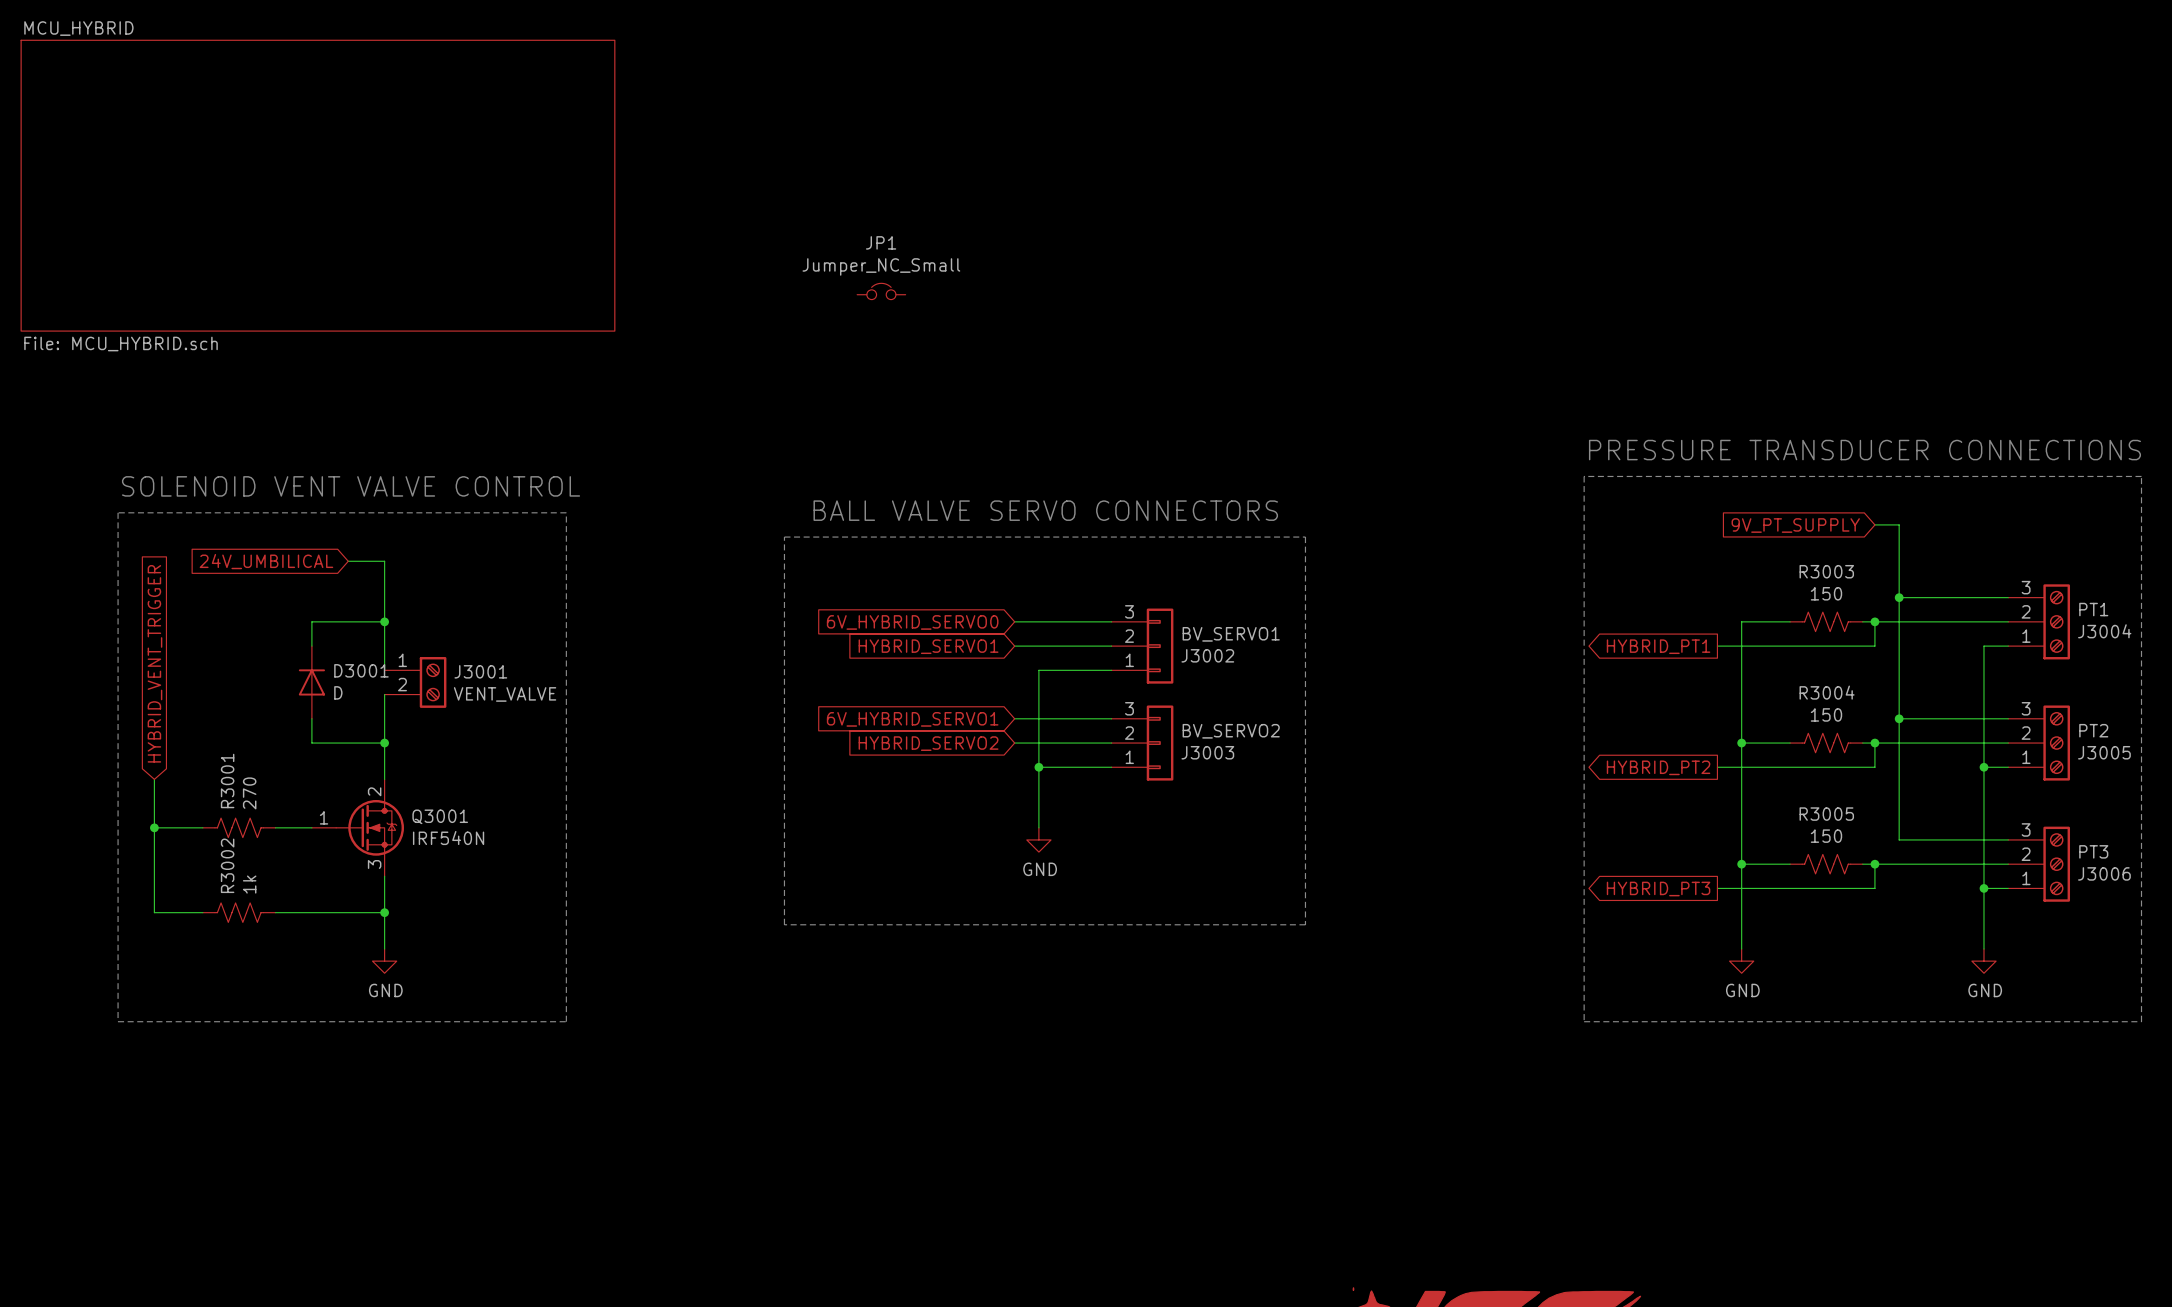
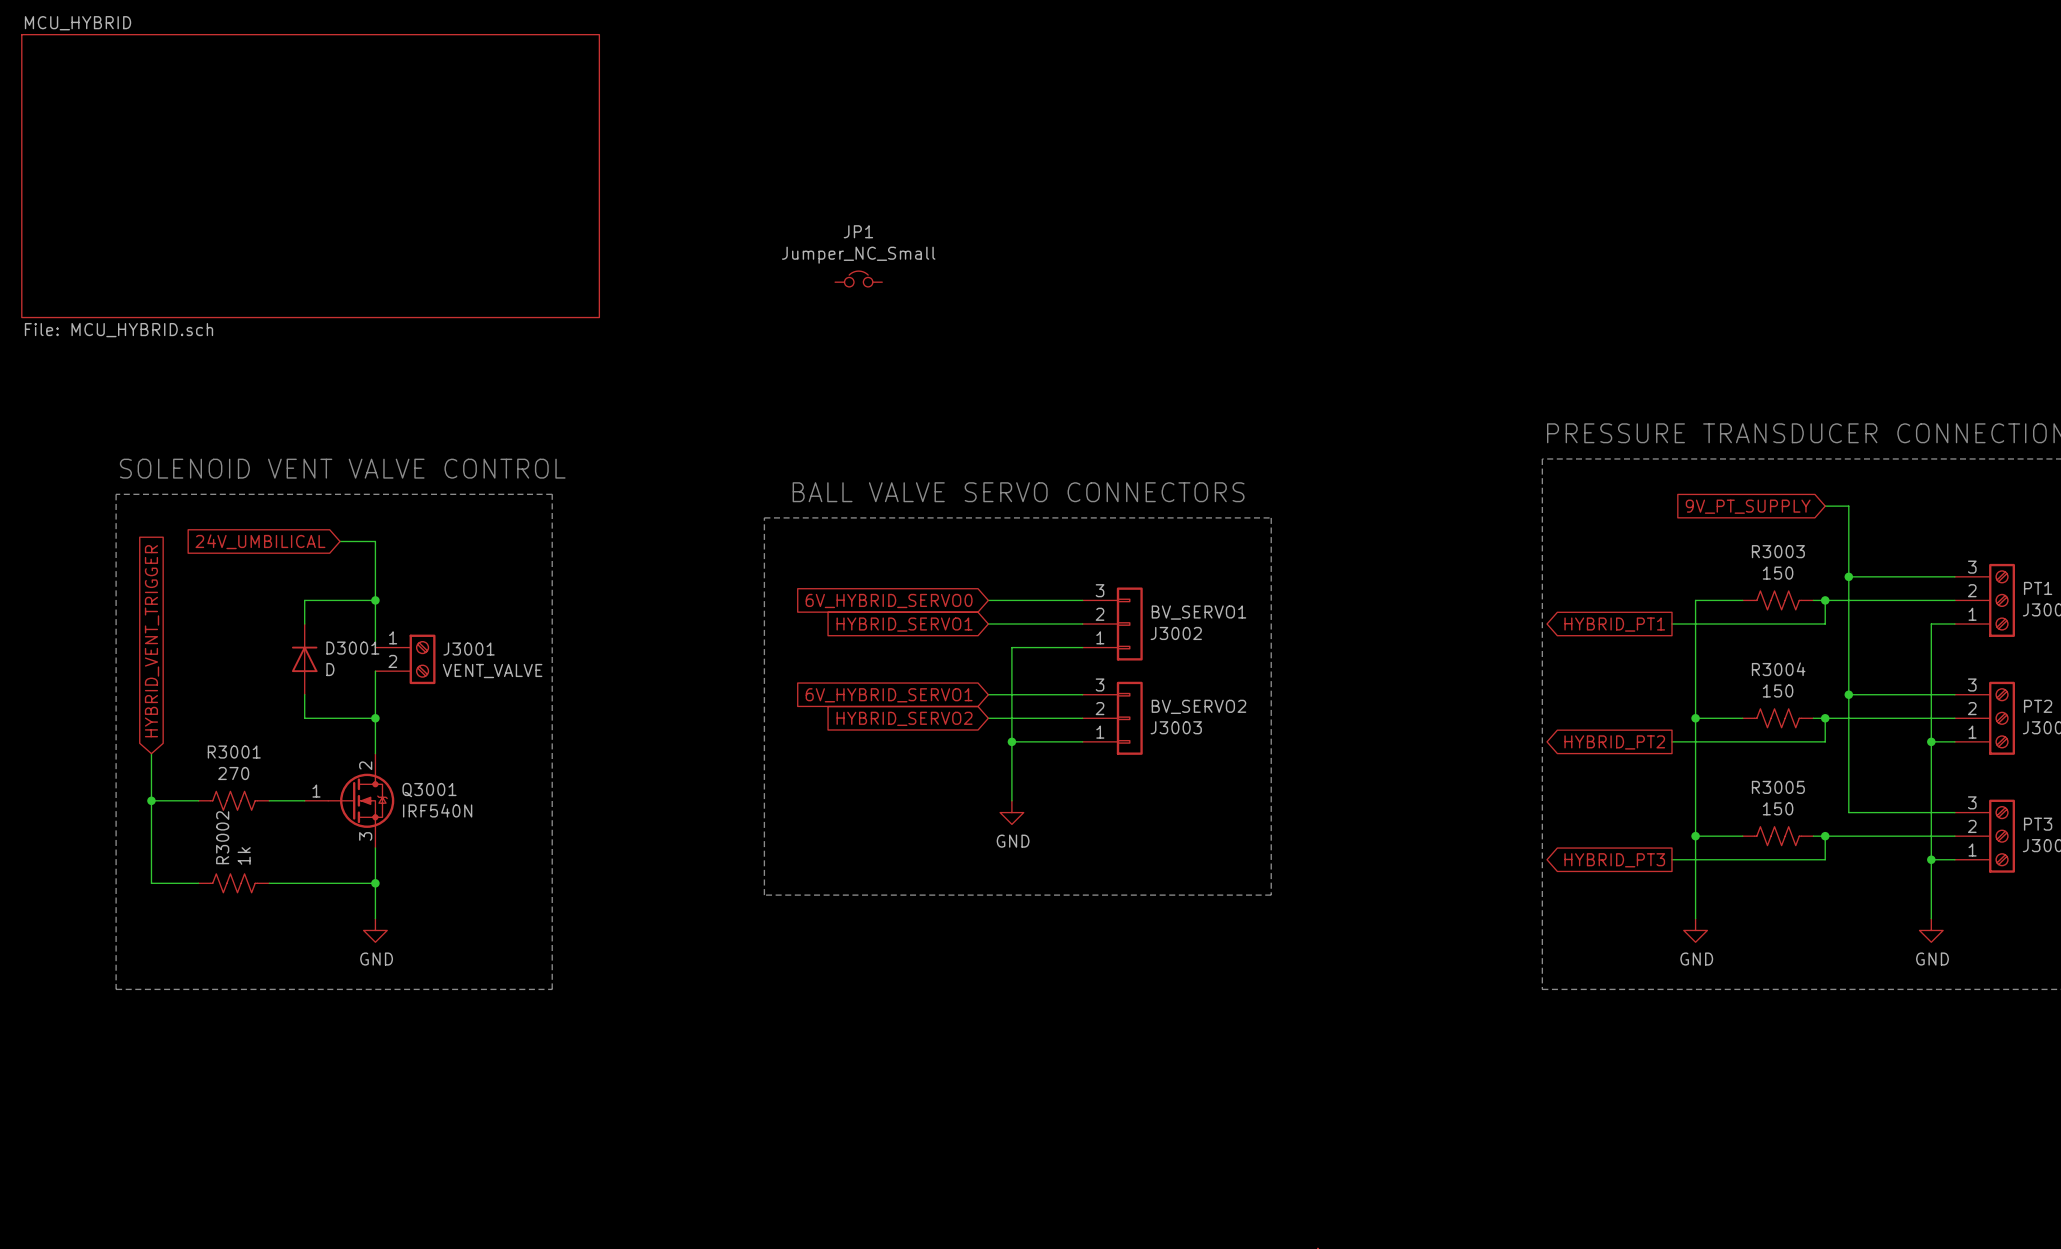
R3001 name rotation: 0° (227, 780) -> 90° clockwise (234, 752)
R3001 value rotation: 0° (249, 793) -> 90° clockwise (233, 773)

